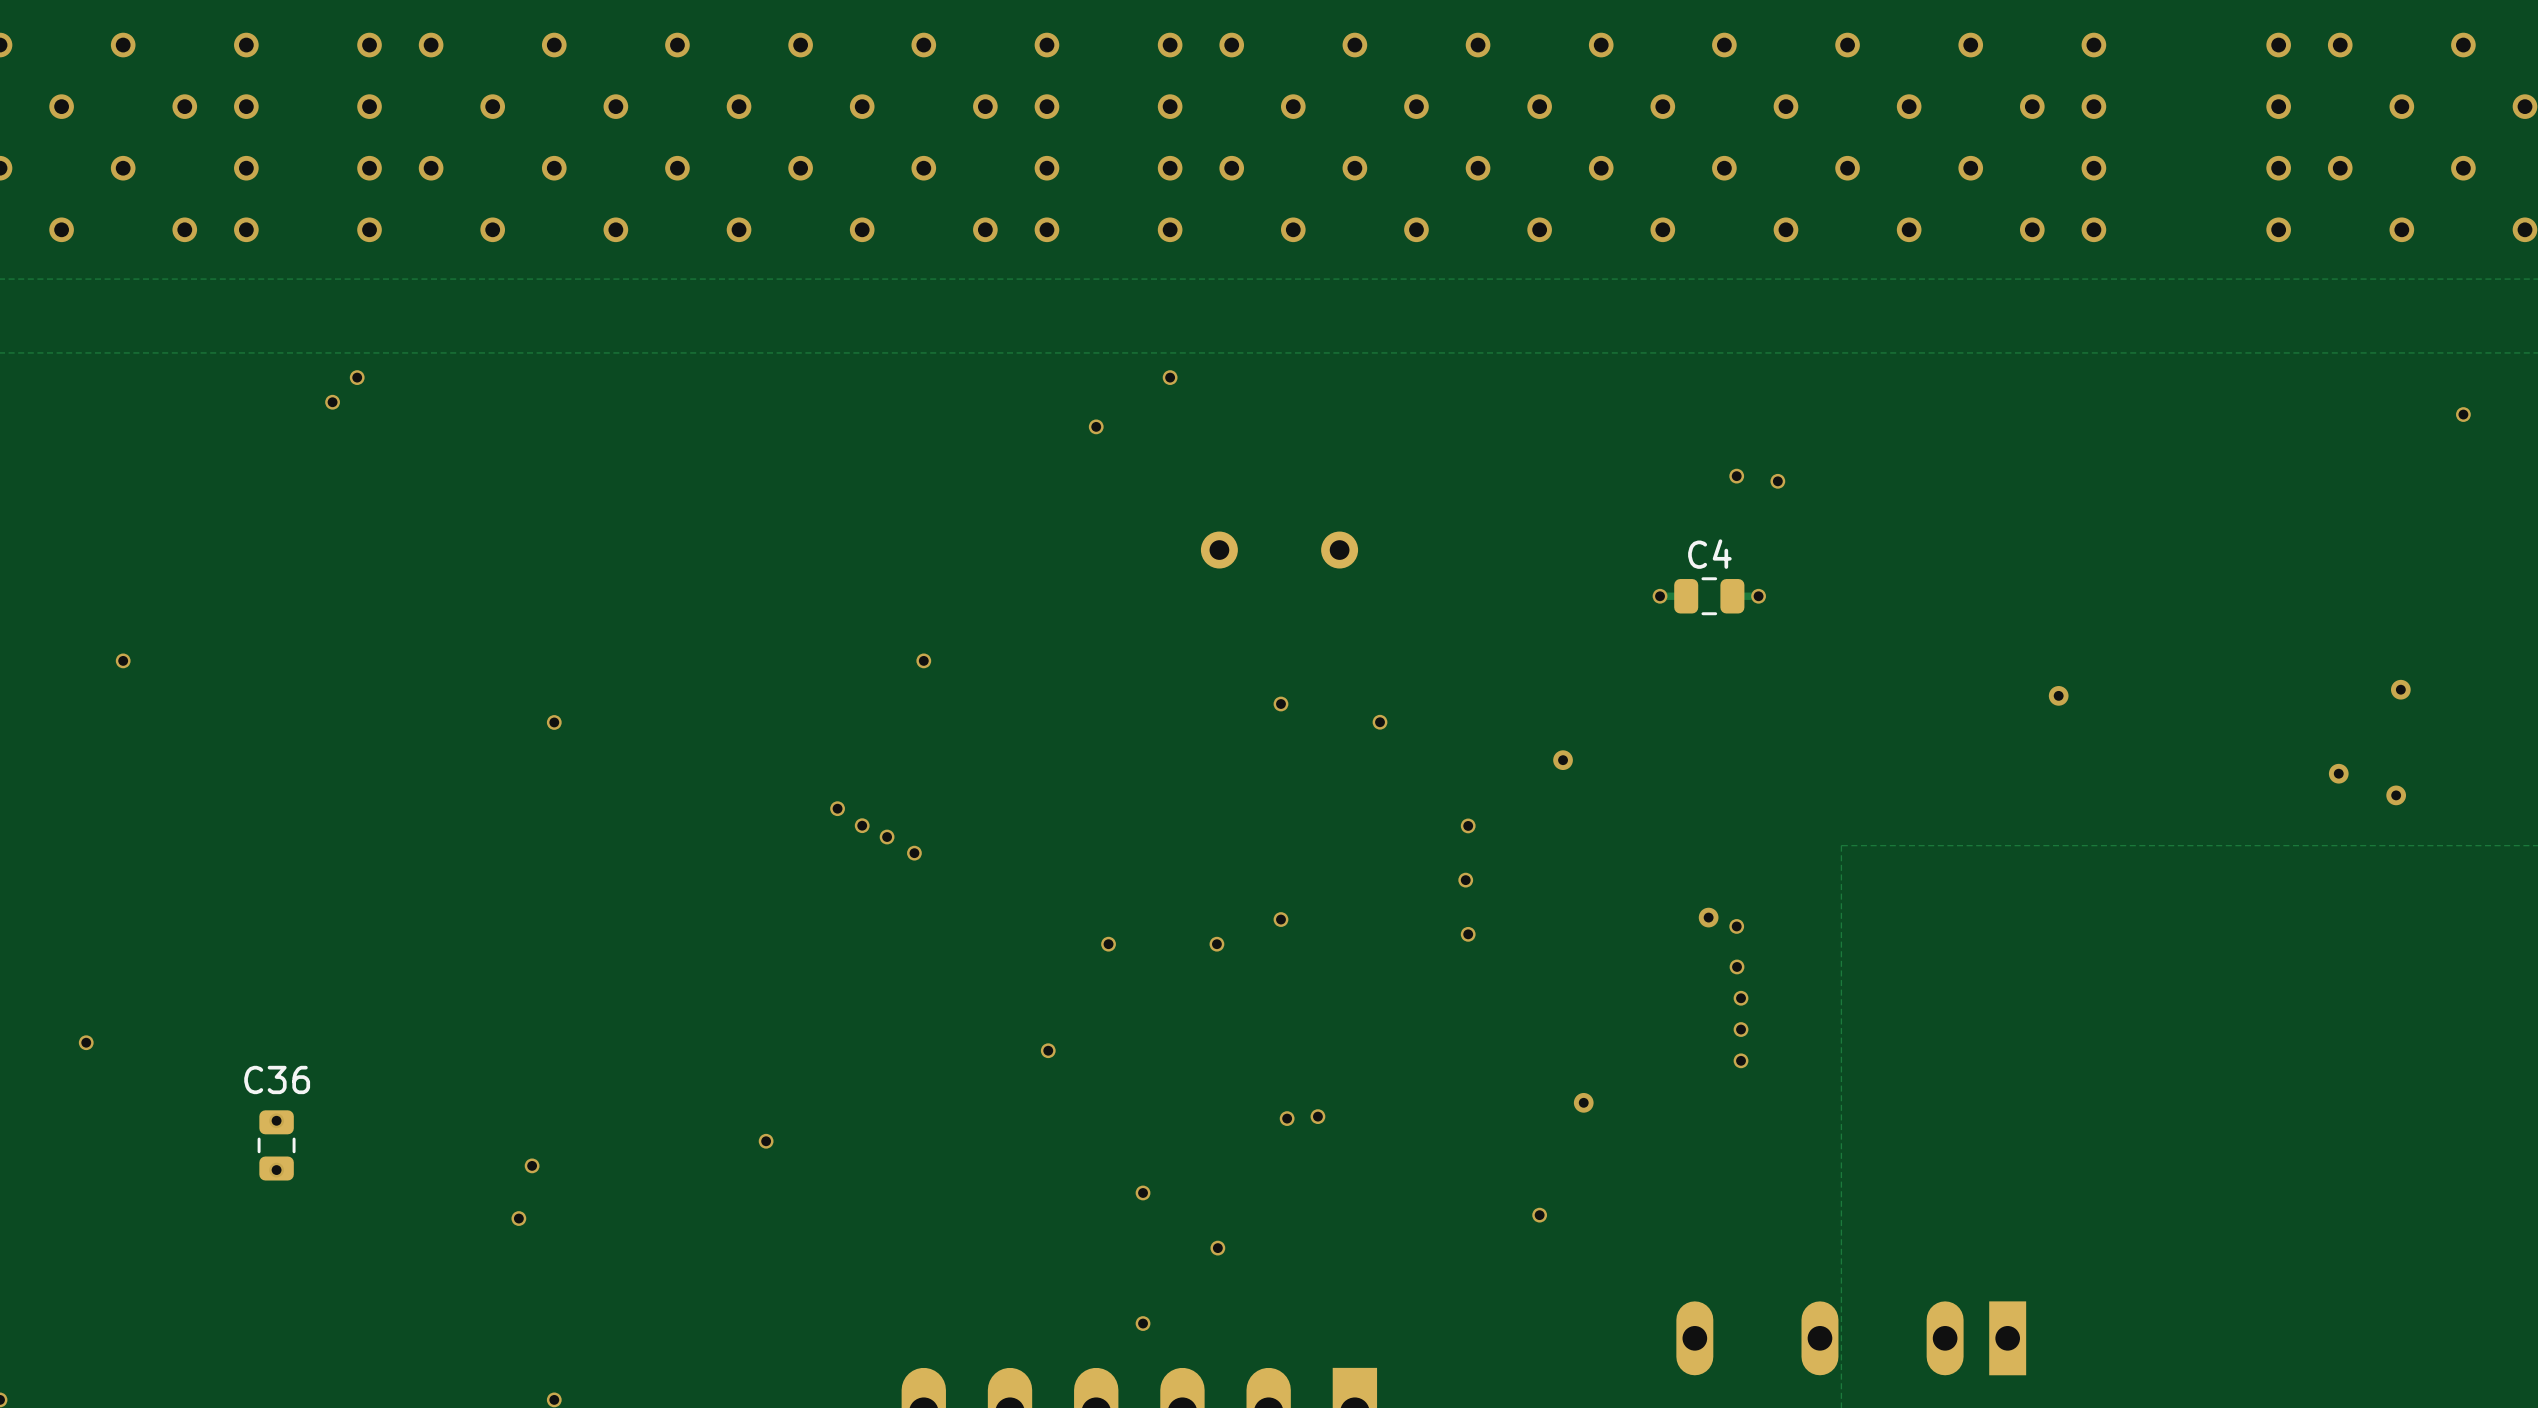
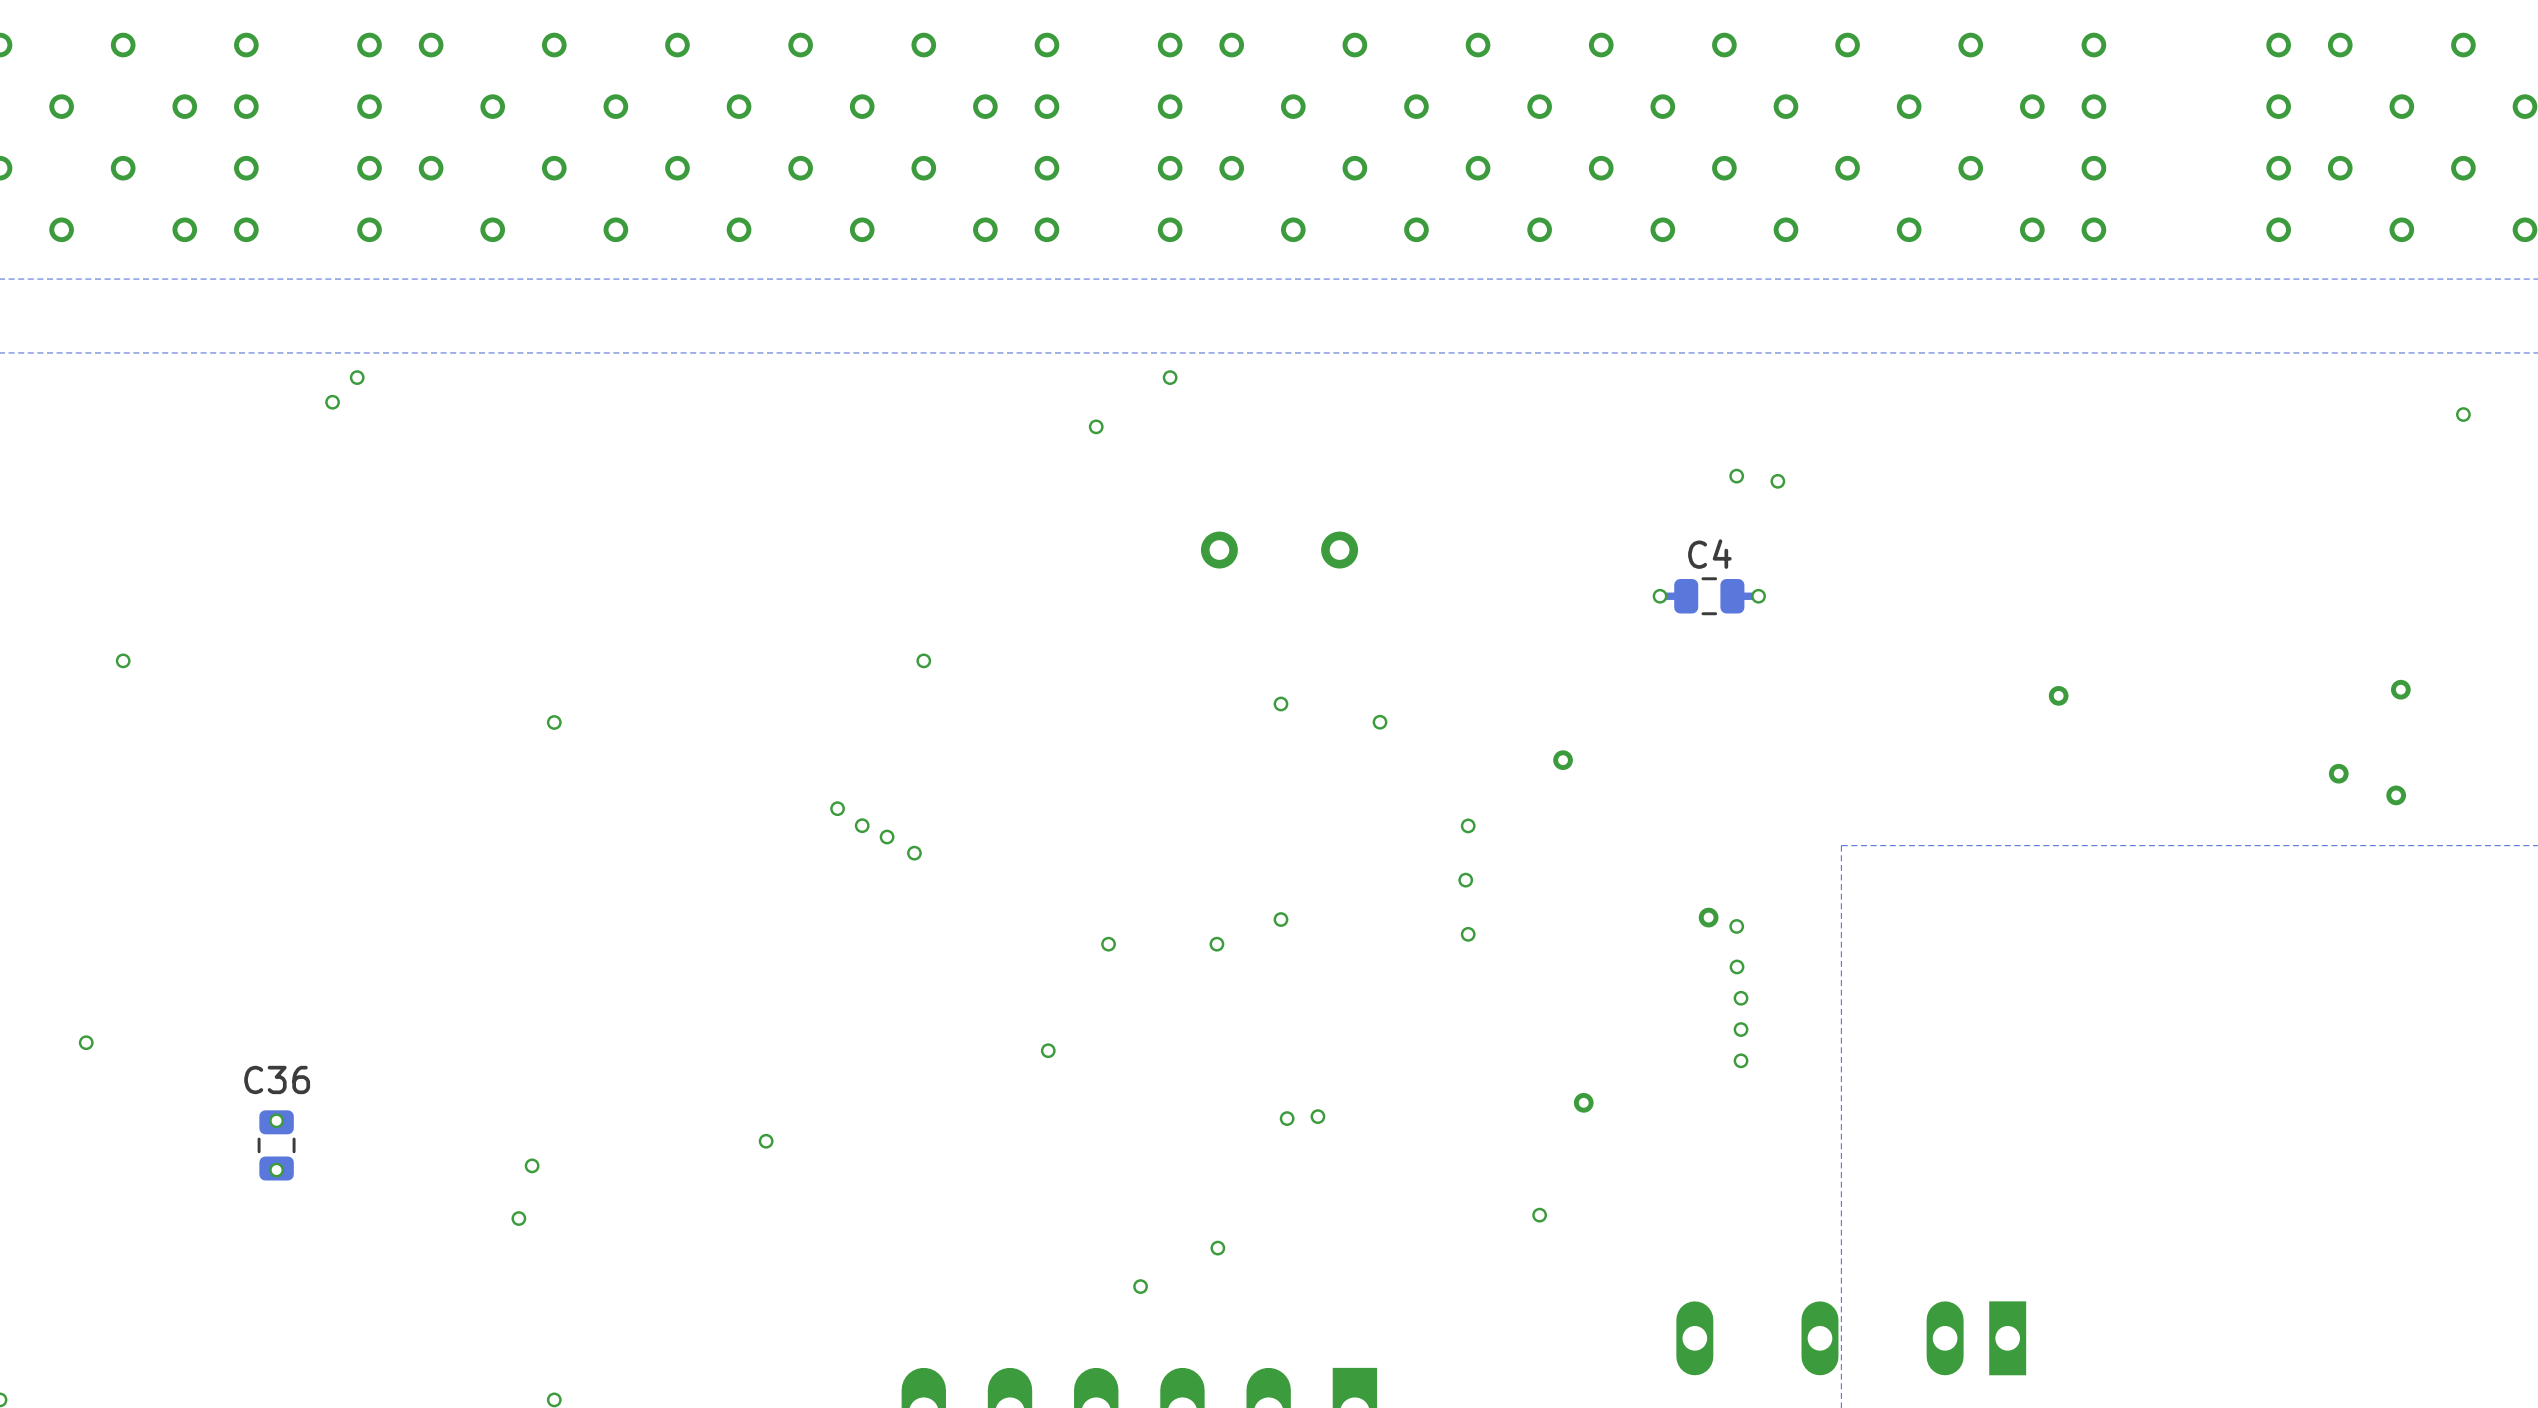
via: (1143, 1192) -> none
via position: (1143, 1323) -> (1140, 1286)

